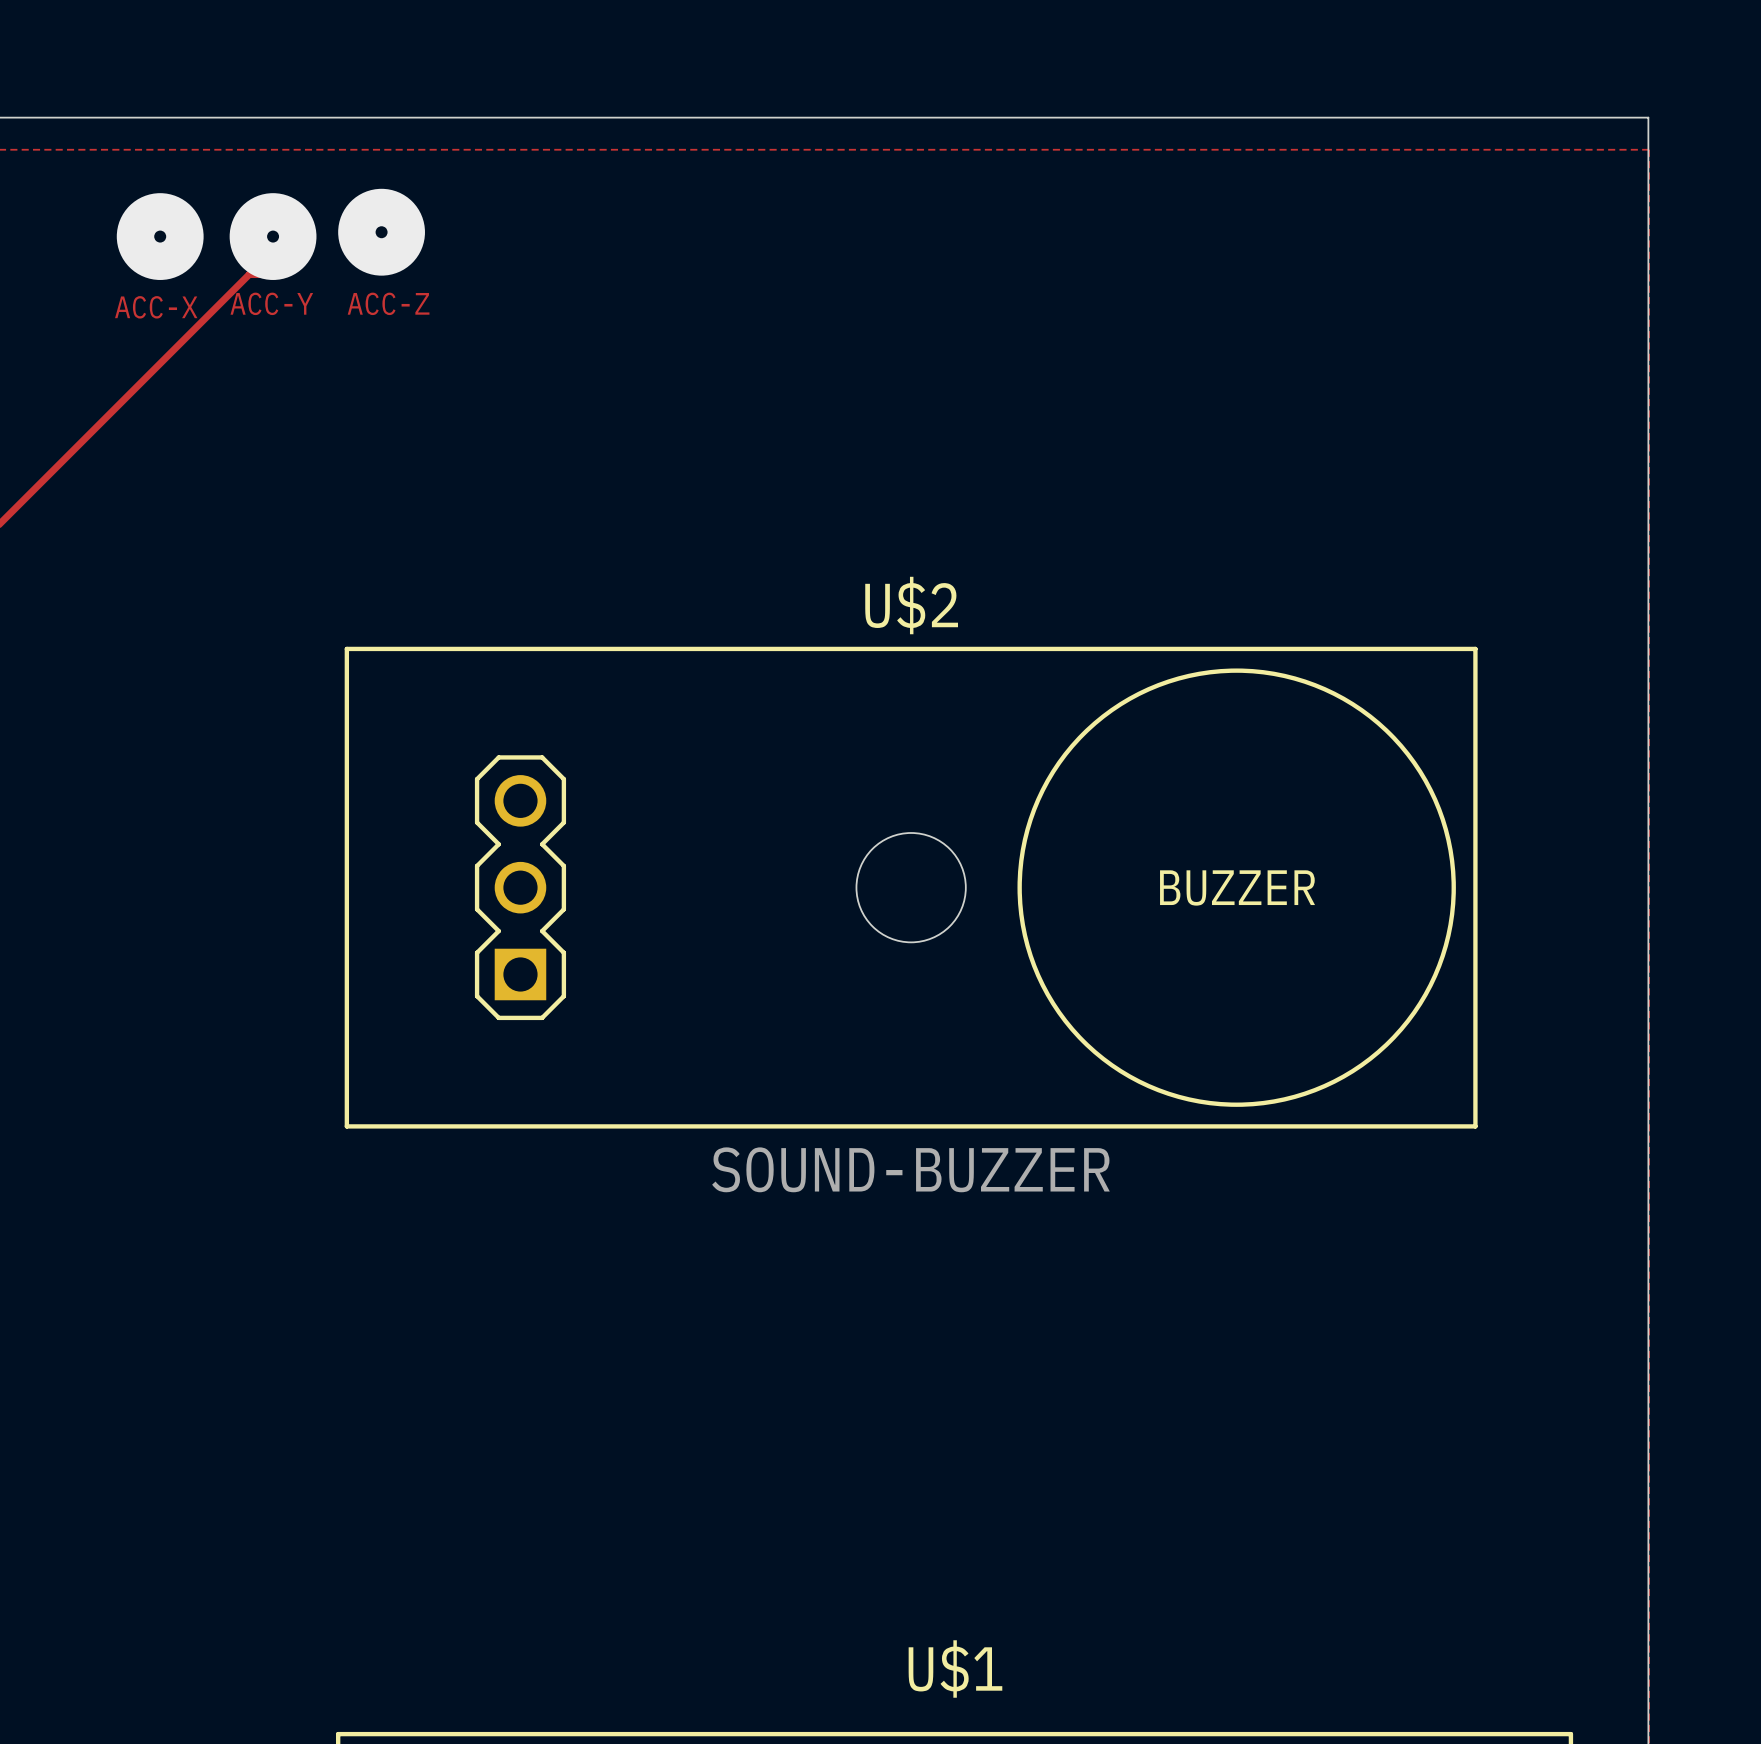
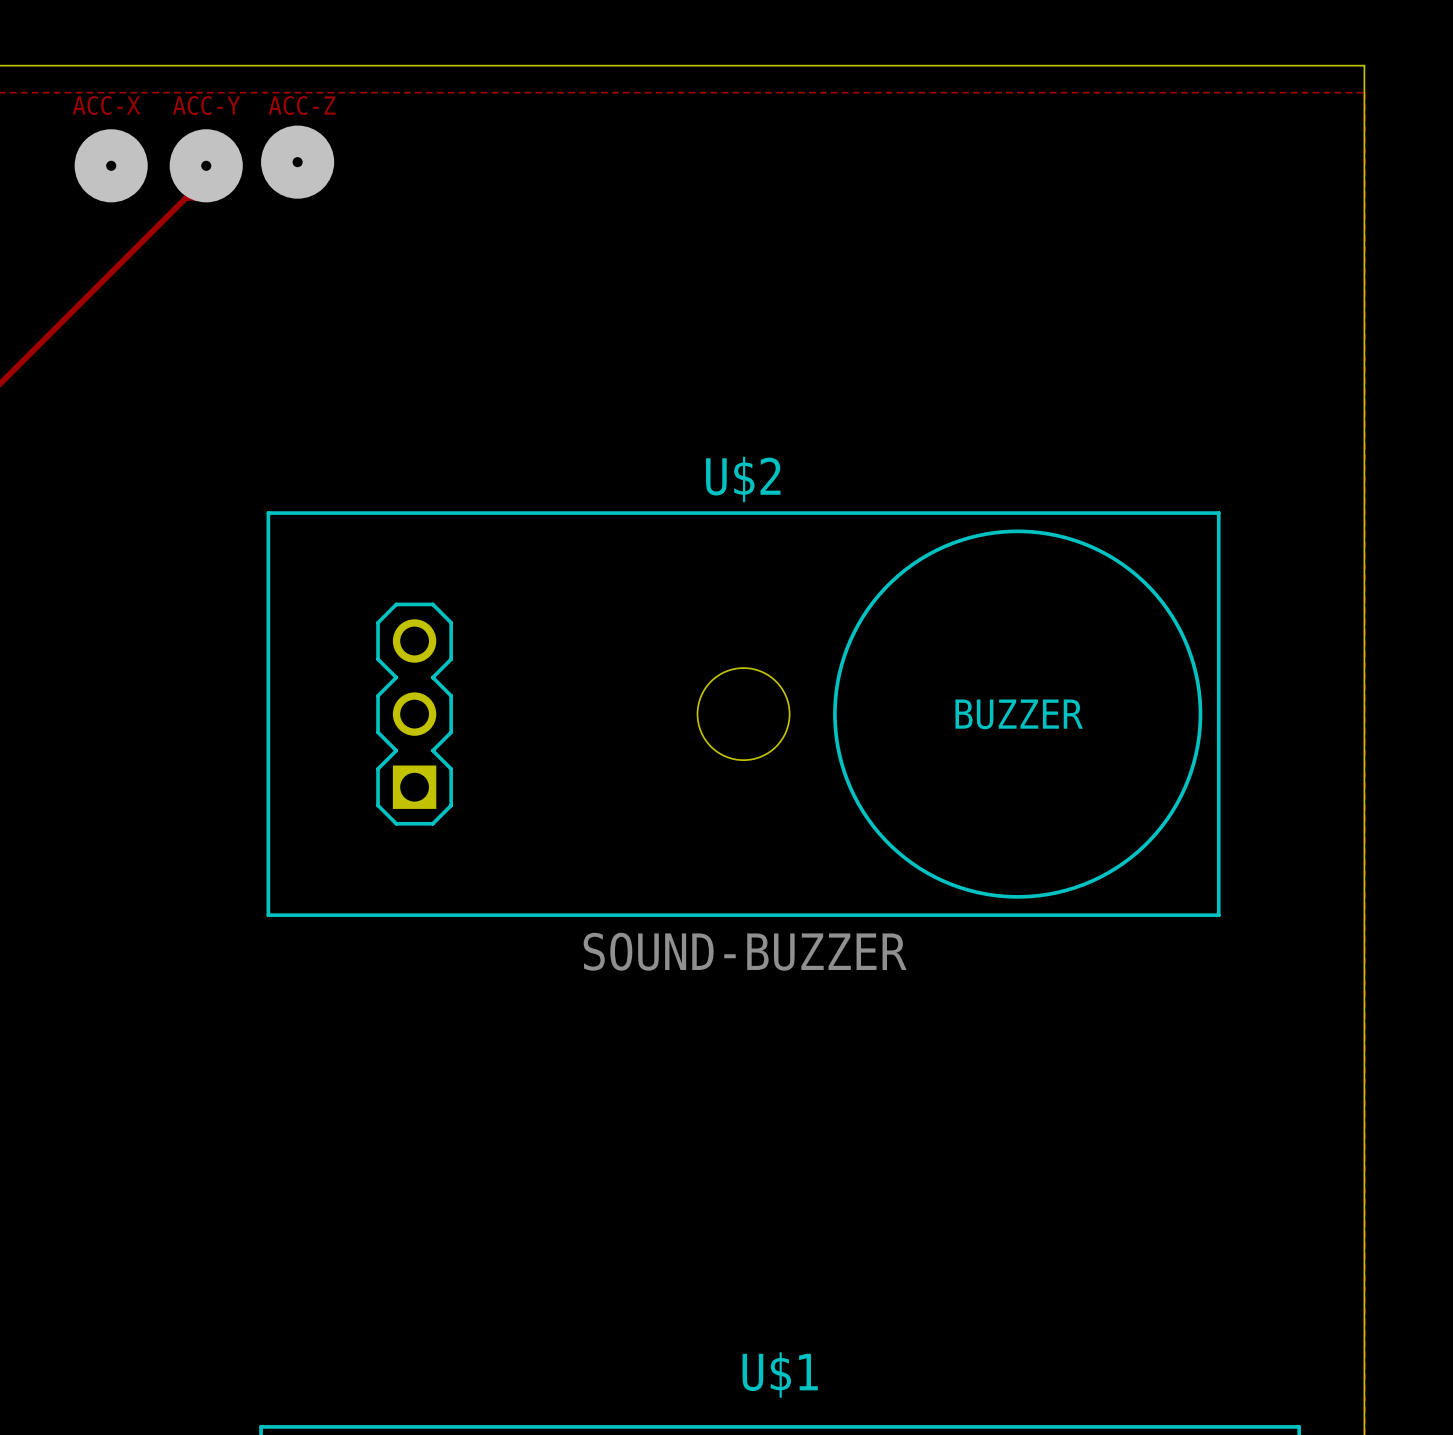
text position: ACC-Y (271, 303) -> ACC-Y (206, 105)
text position: ACC-Z (388, 303) -> ACC-Z (302, 105)
text position: ACC-X (156, 307) -> ACC-X (106, 105)

